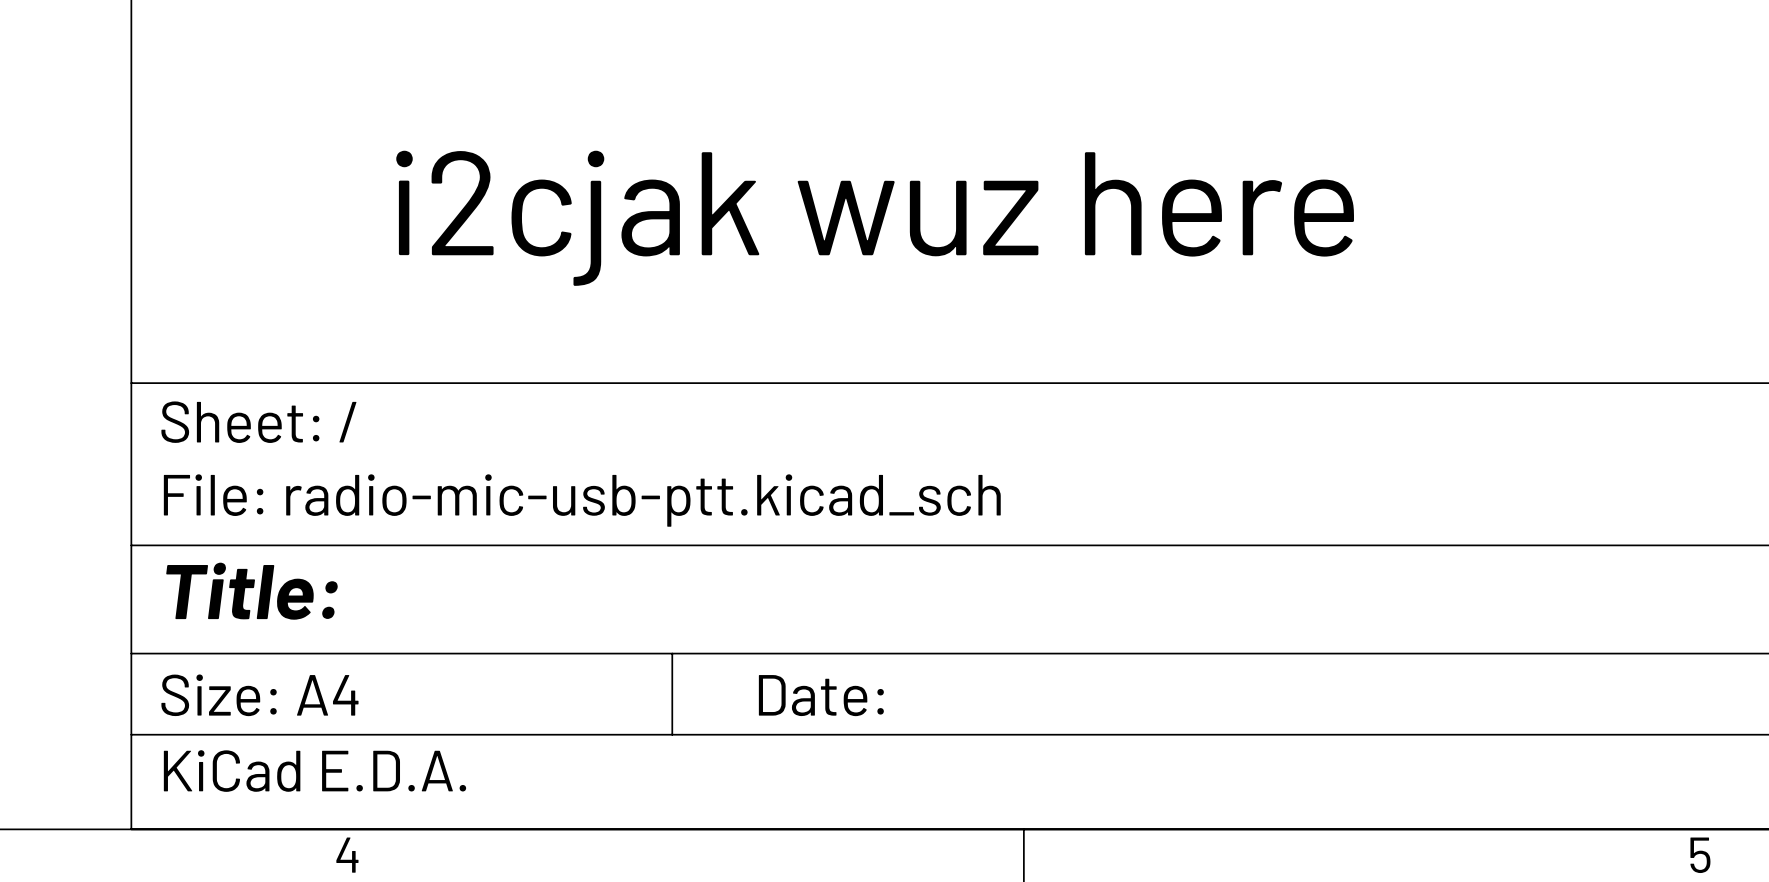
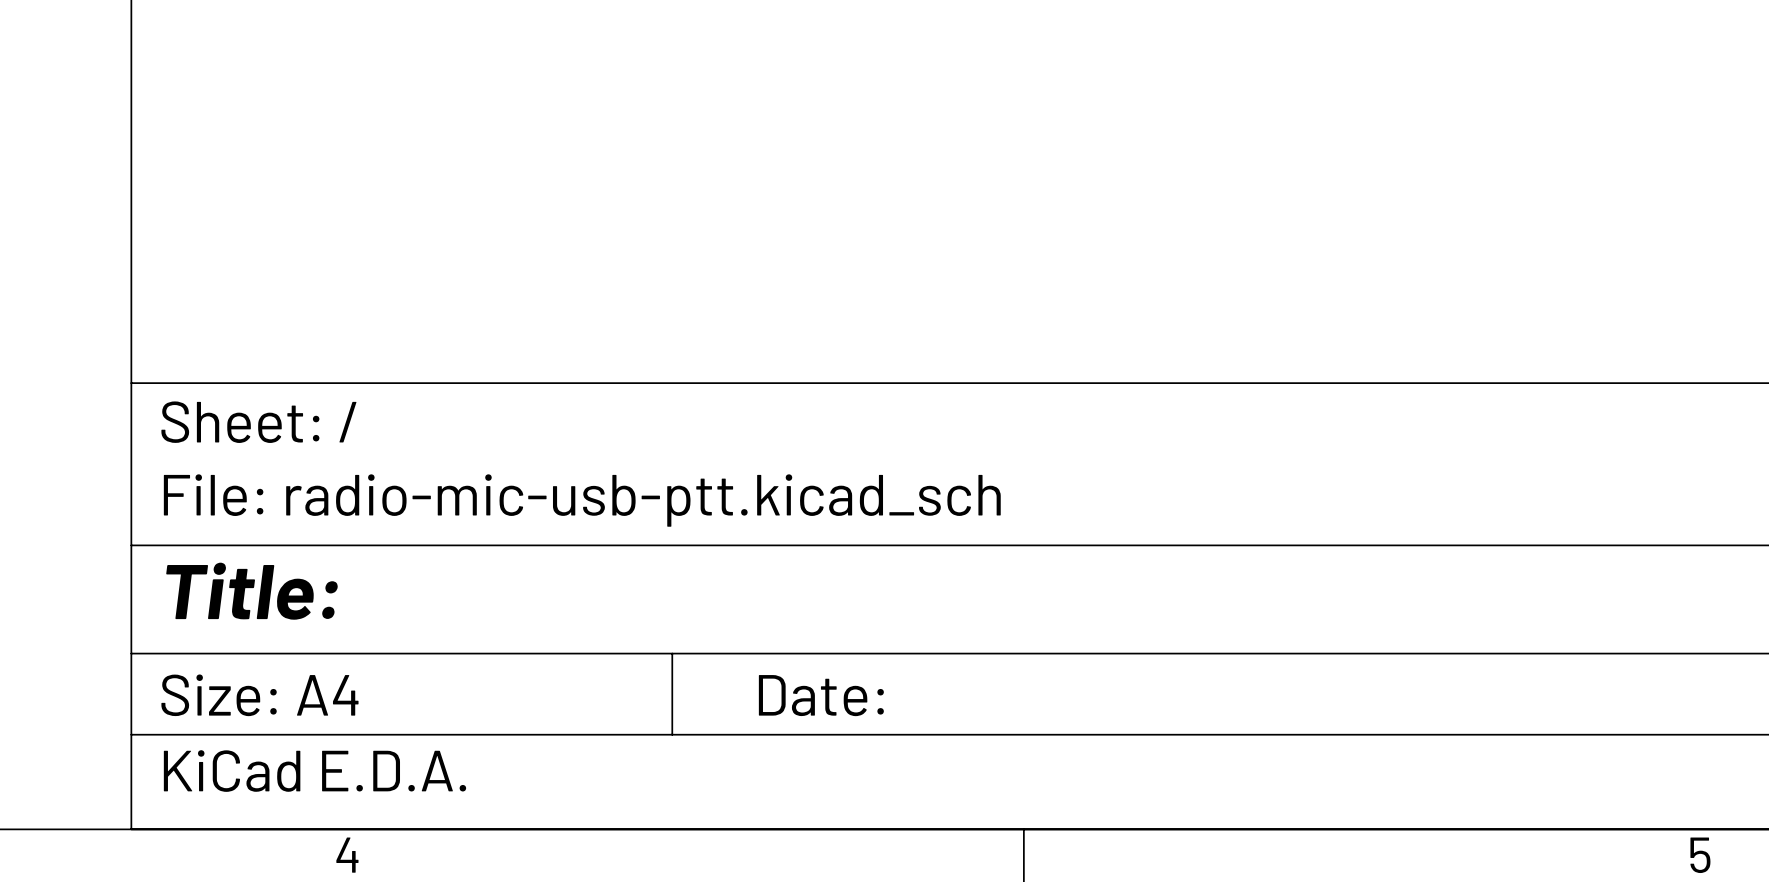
text: i2cjak wuz here (875, 218) -> none

